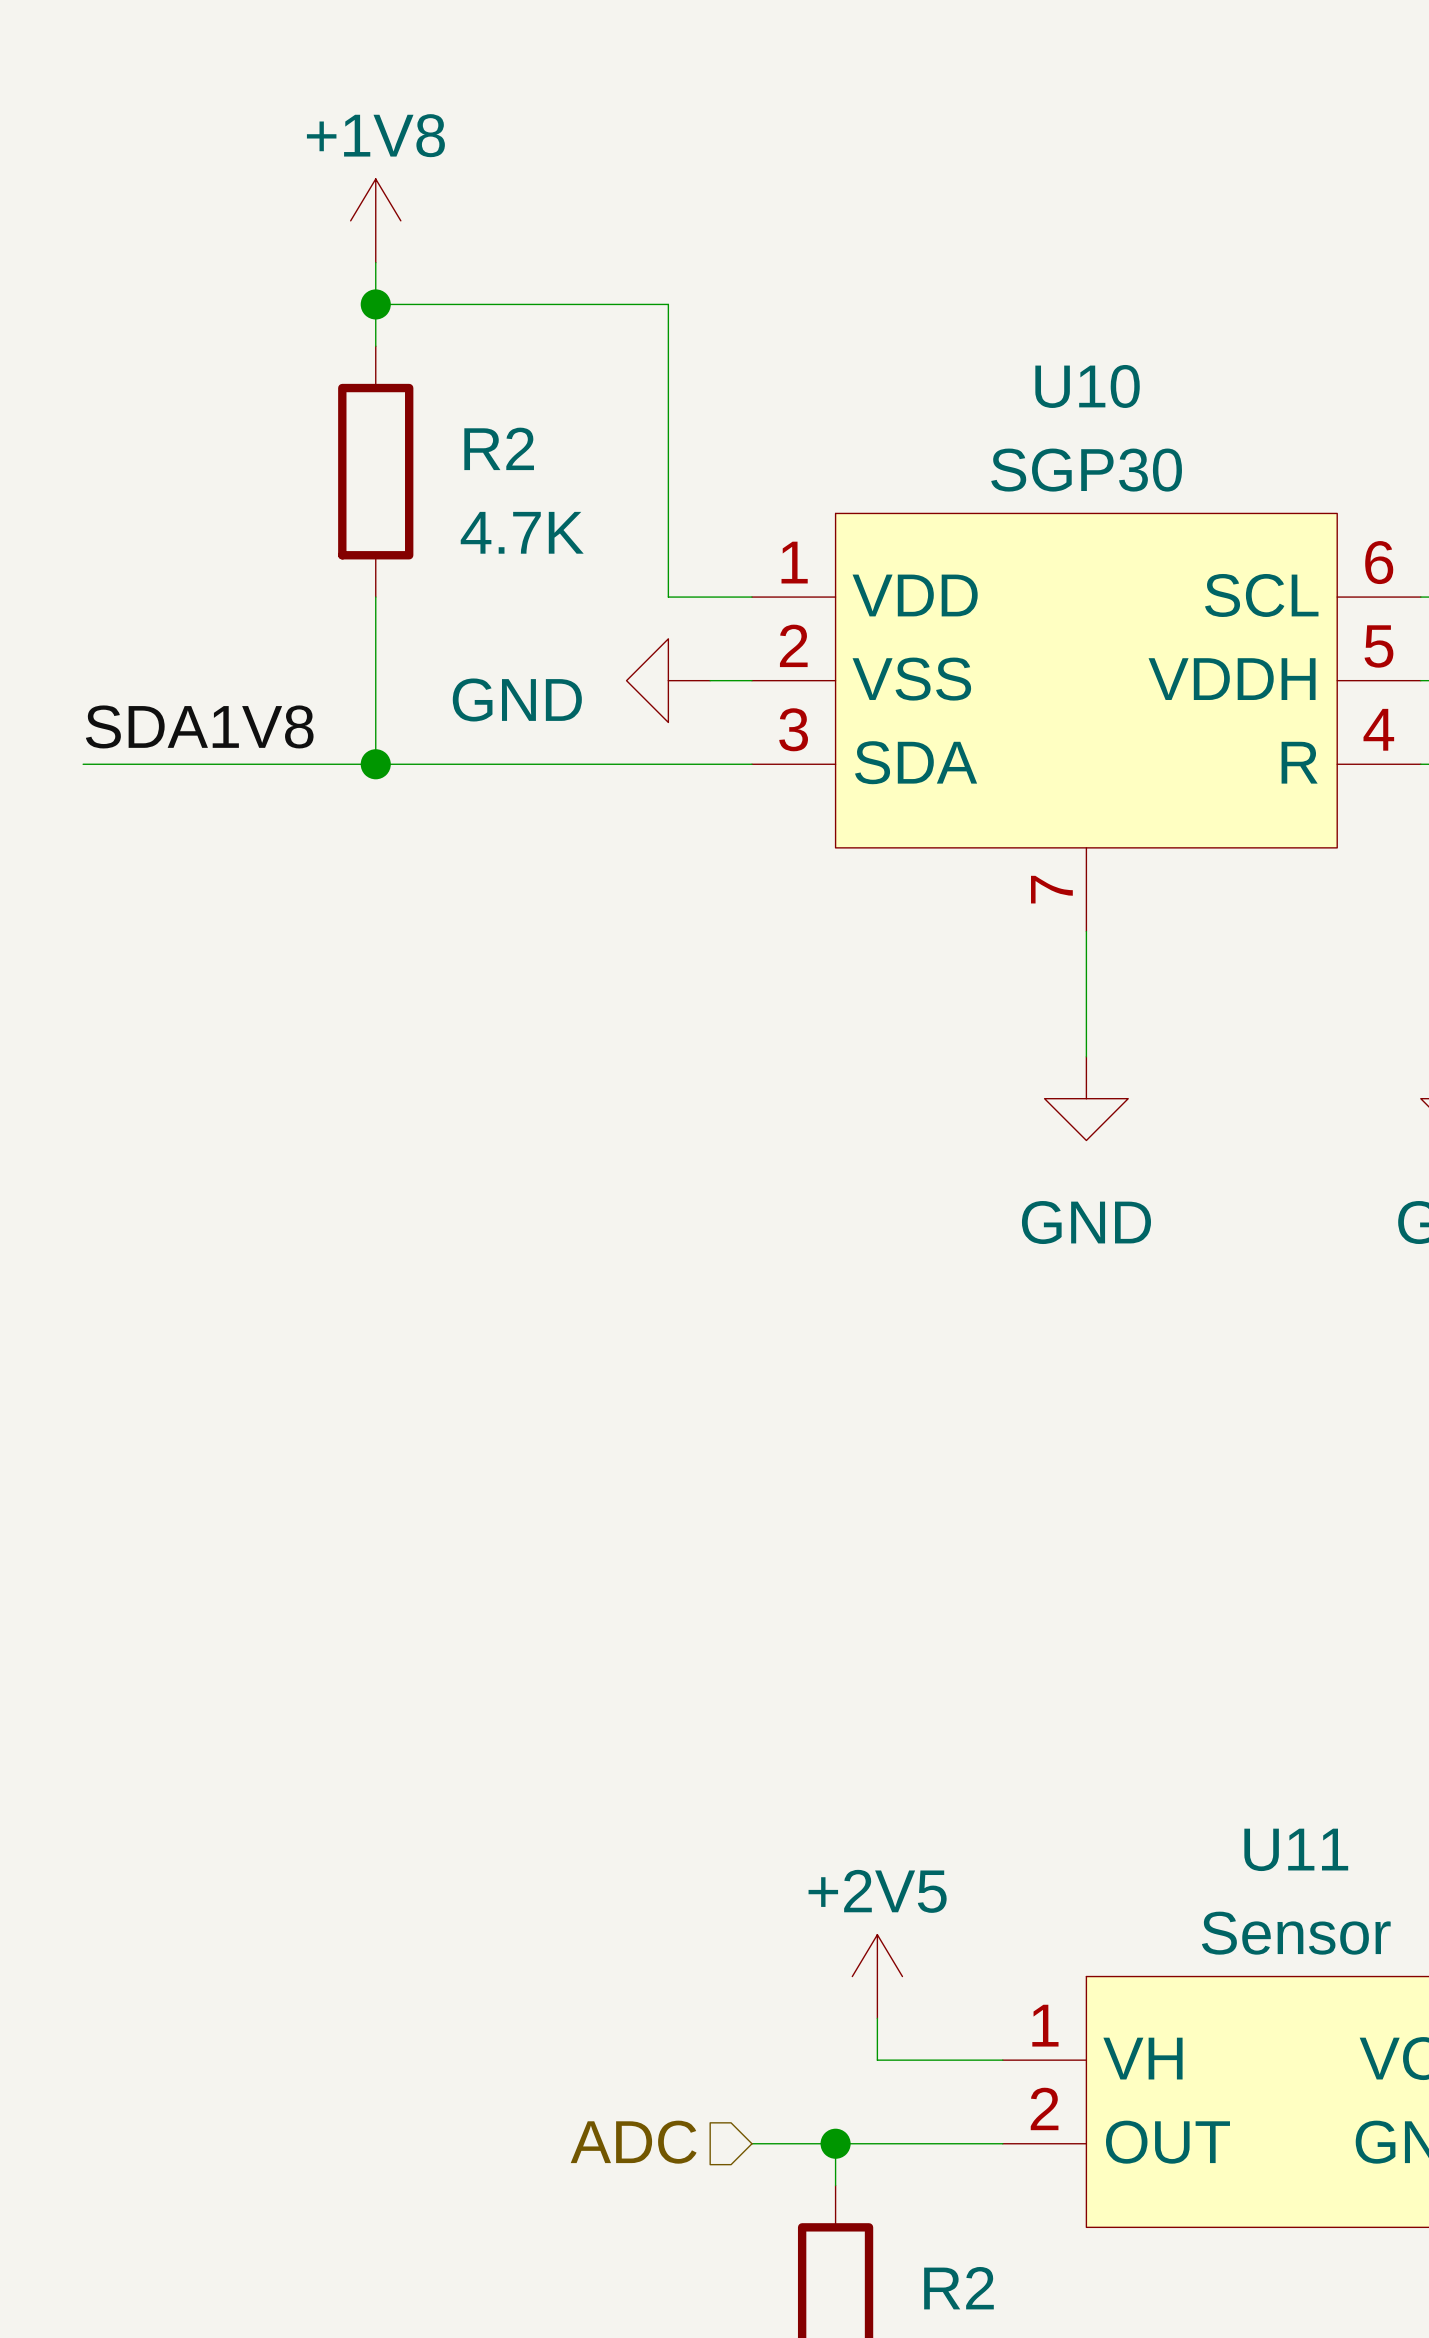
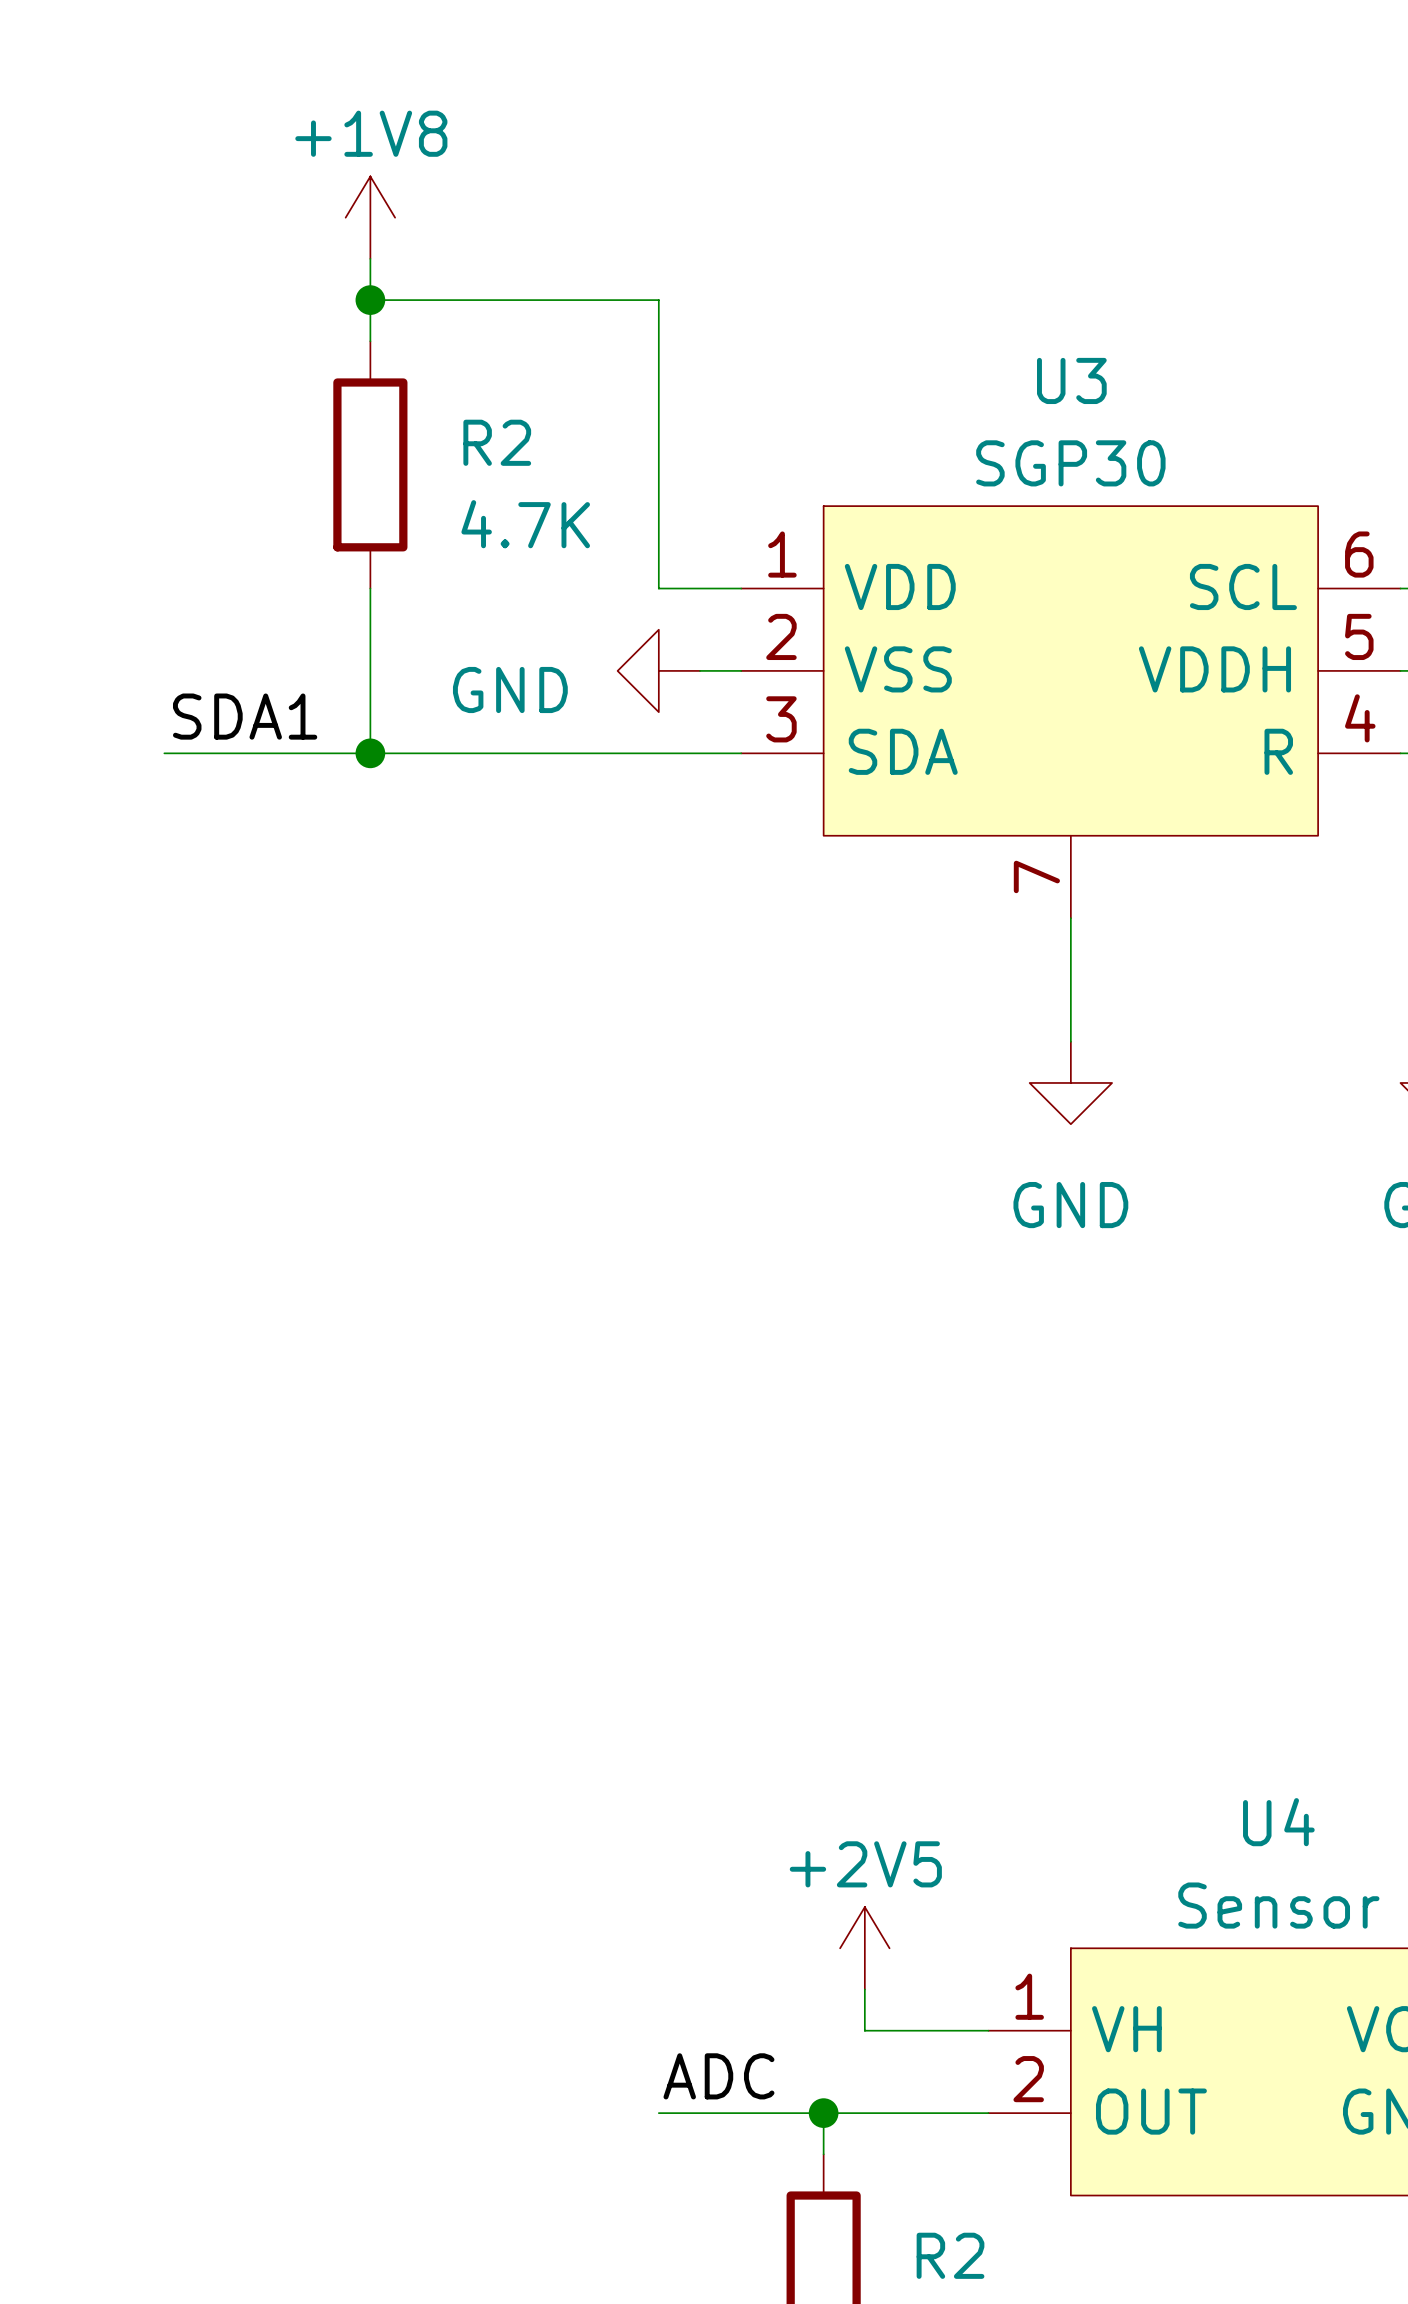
U10 name: U10 (1087, 386) -> U3 (1071, 380)
label: SDA1V8 (199, 726) -> SDA1 (245, 716)
wire: (83, 764) (166, 764) -> none
U11 name: U11 (1296, 1849) -> U4 (1278, 1822)
label: none -> ADC (718, 2076)
hierarchical label: ADC (633, 2142) -> none
wire: none -> (658, 2113) (741, 2113)

